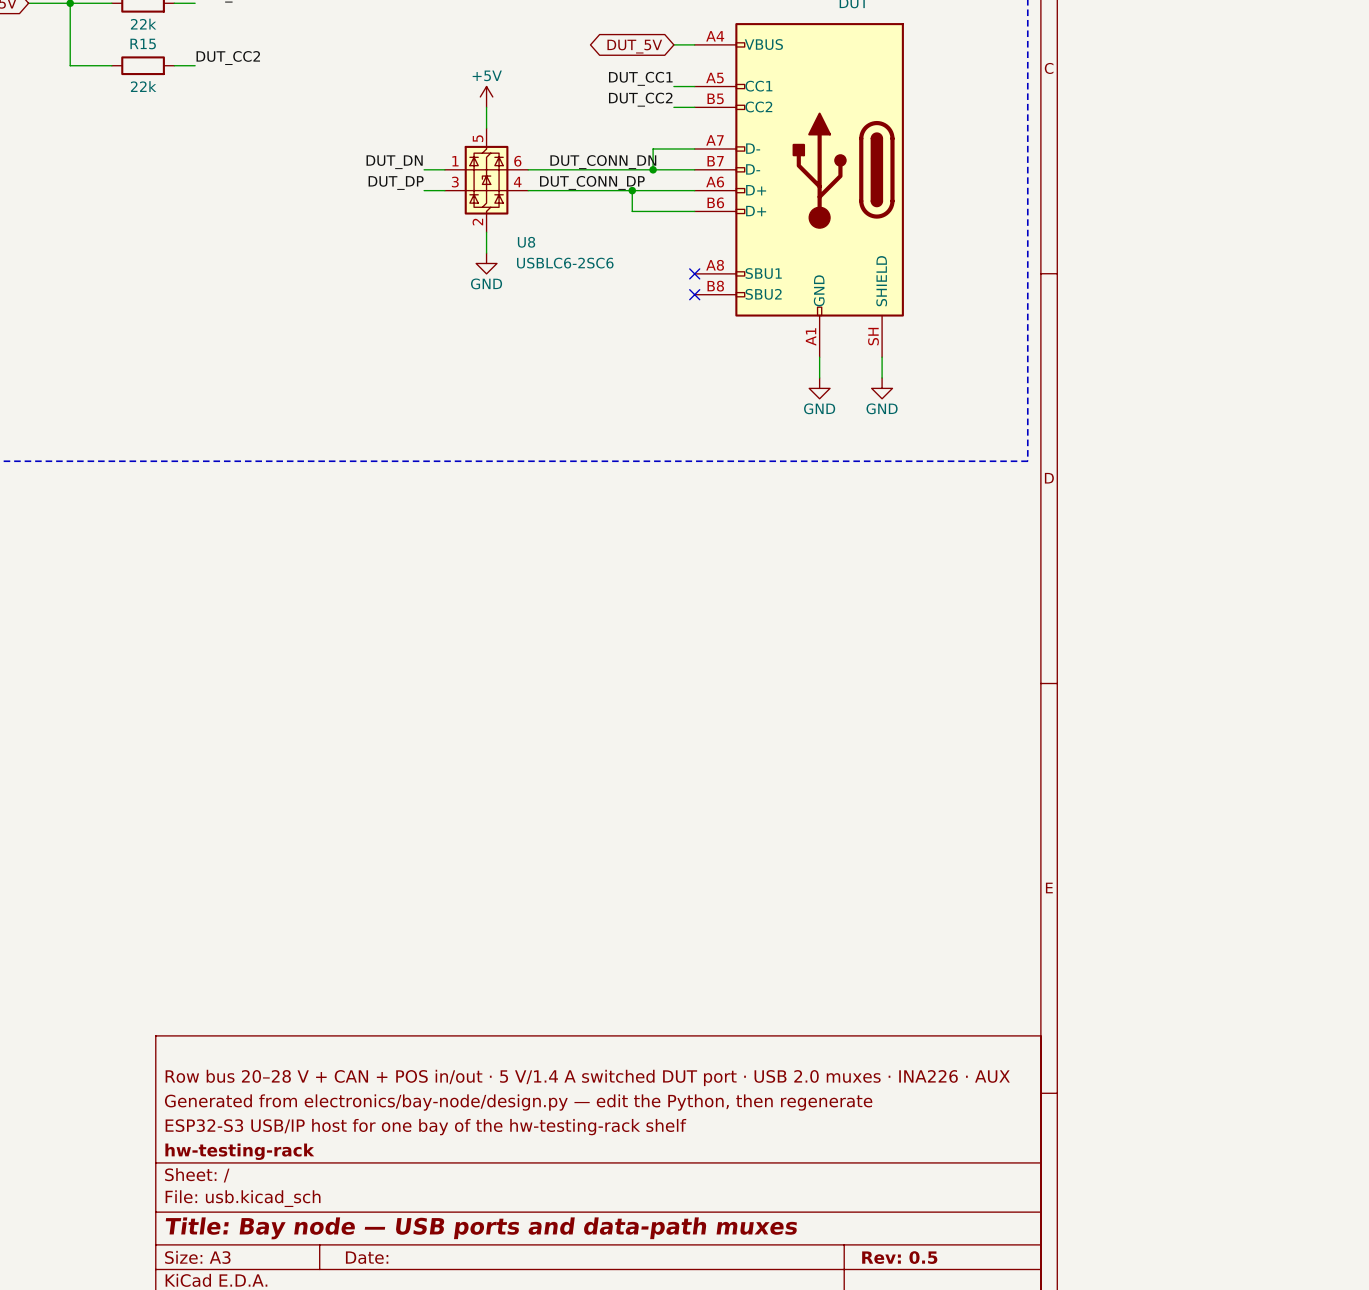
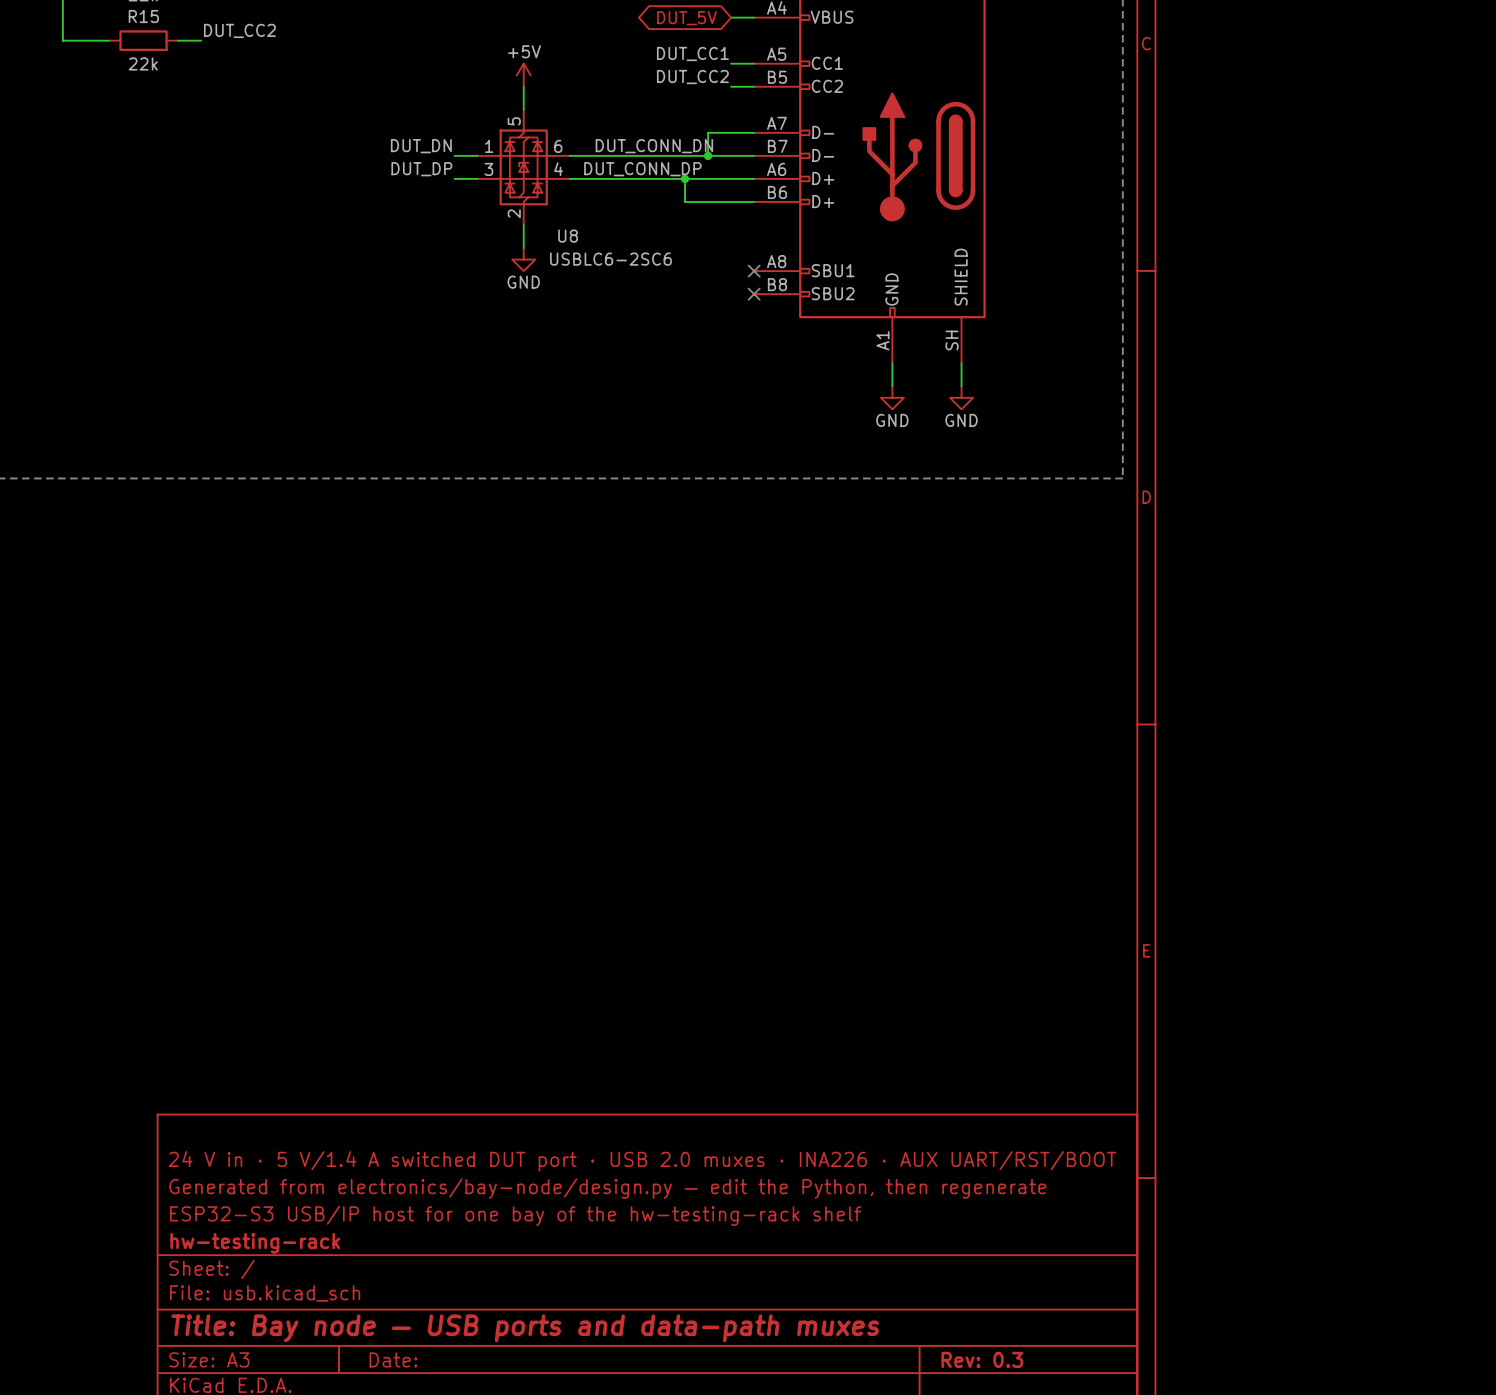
title block: Row bus 20–28 V + CAN + POS in/out · 5 V/1.4 A switched DUT port · USB 2.0 muxes · INA226 · AUX (587, 1077) -> 24 V in · 5 V/1.4 A switched DUT port · USB 2.0 muxes · INA226 · AUX UART/RST/BOOT (642, 1161)
title block: Rev: 0.5 (899, 1257) -> Rev: 0.3 (982, 1359)

